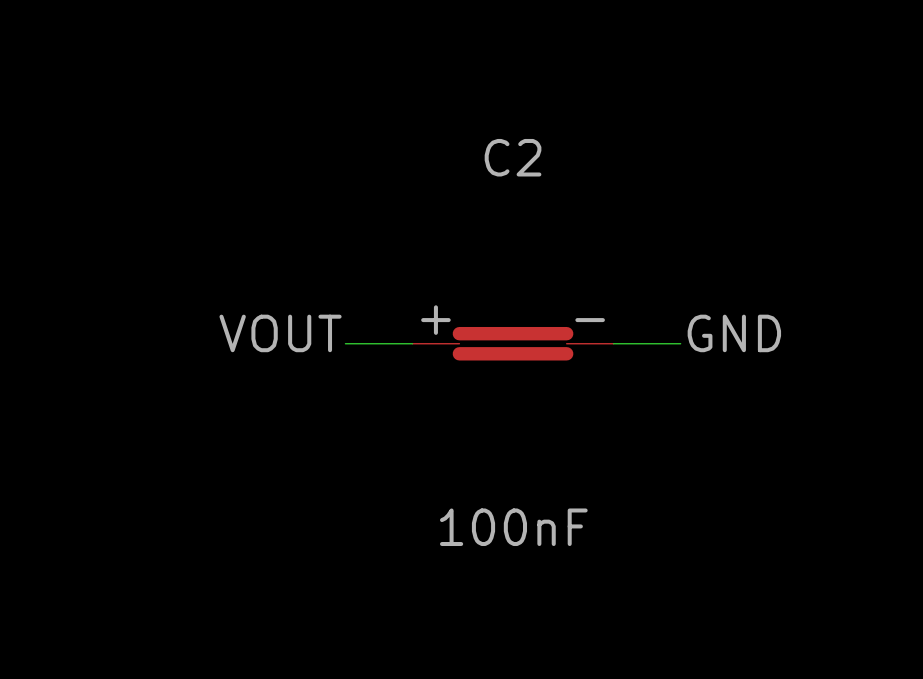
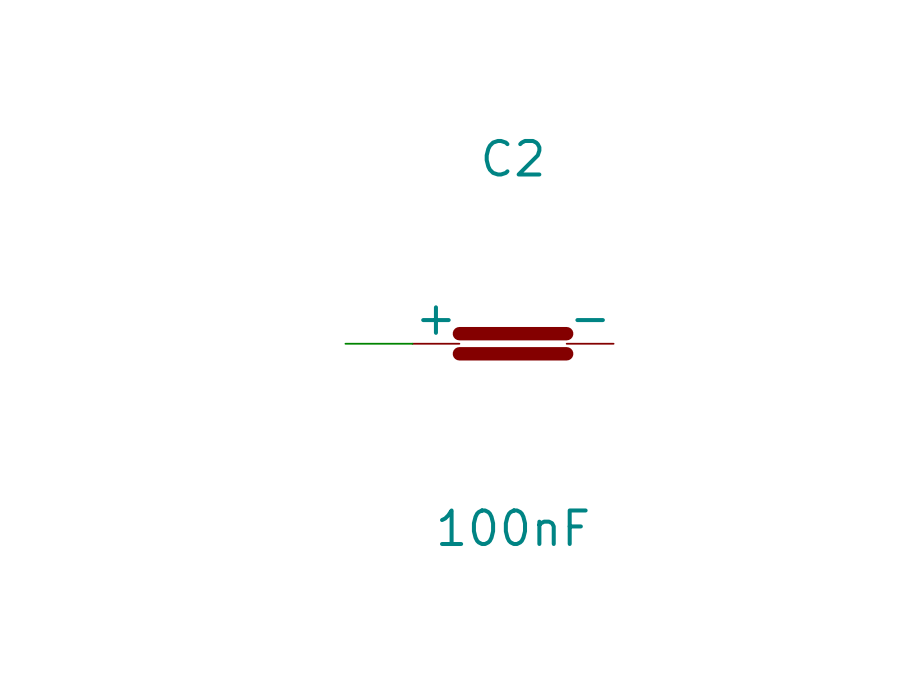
label: VOUT (280, 333) -> none
label: GND (734, 333) -> none
wire: (613, 343) (680, 343) -> none

